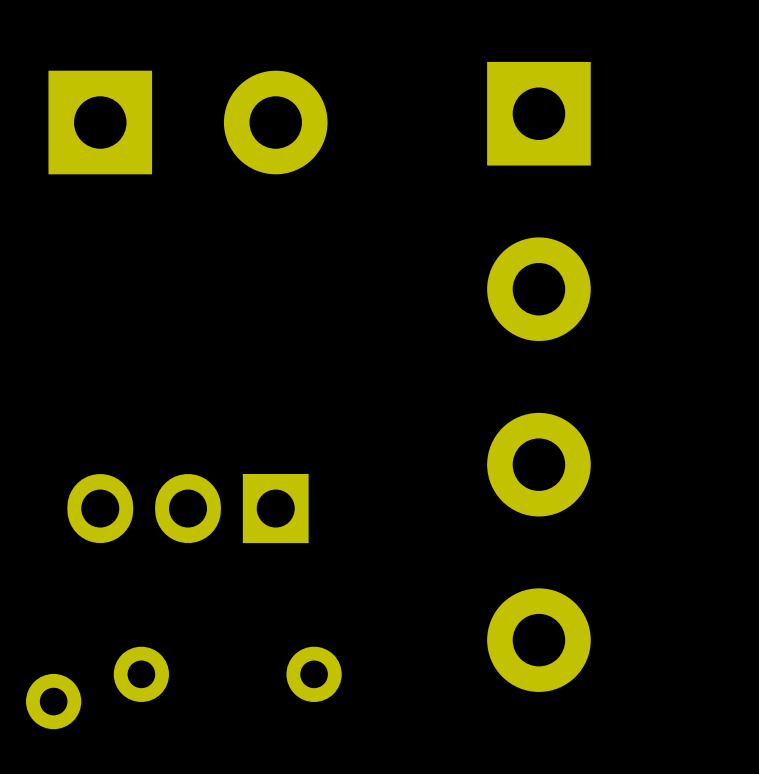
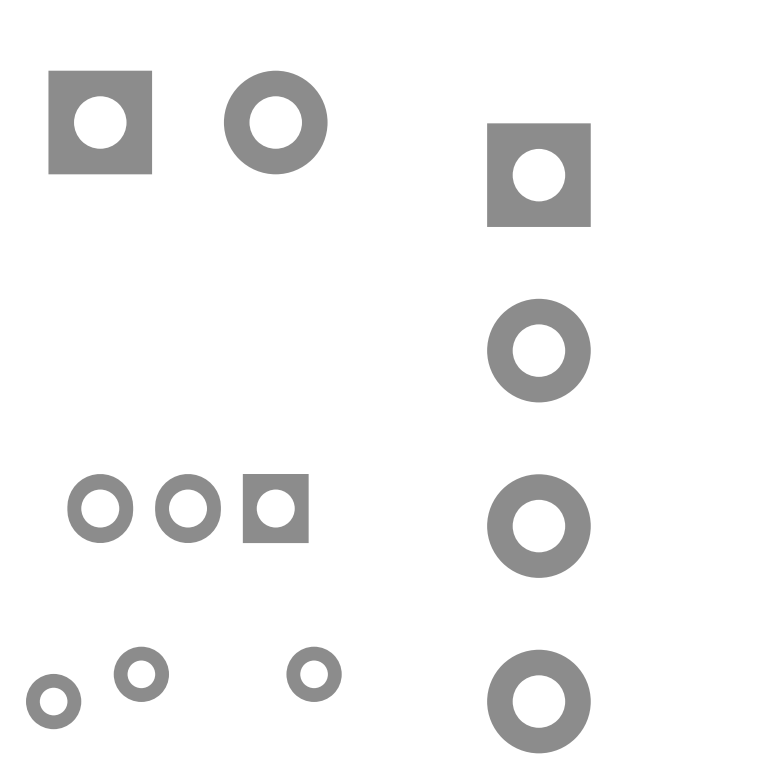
part position: (538, 376) -> (538, 438)

